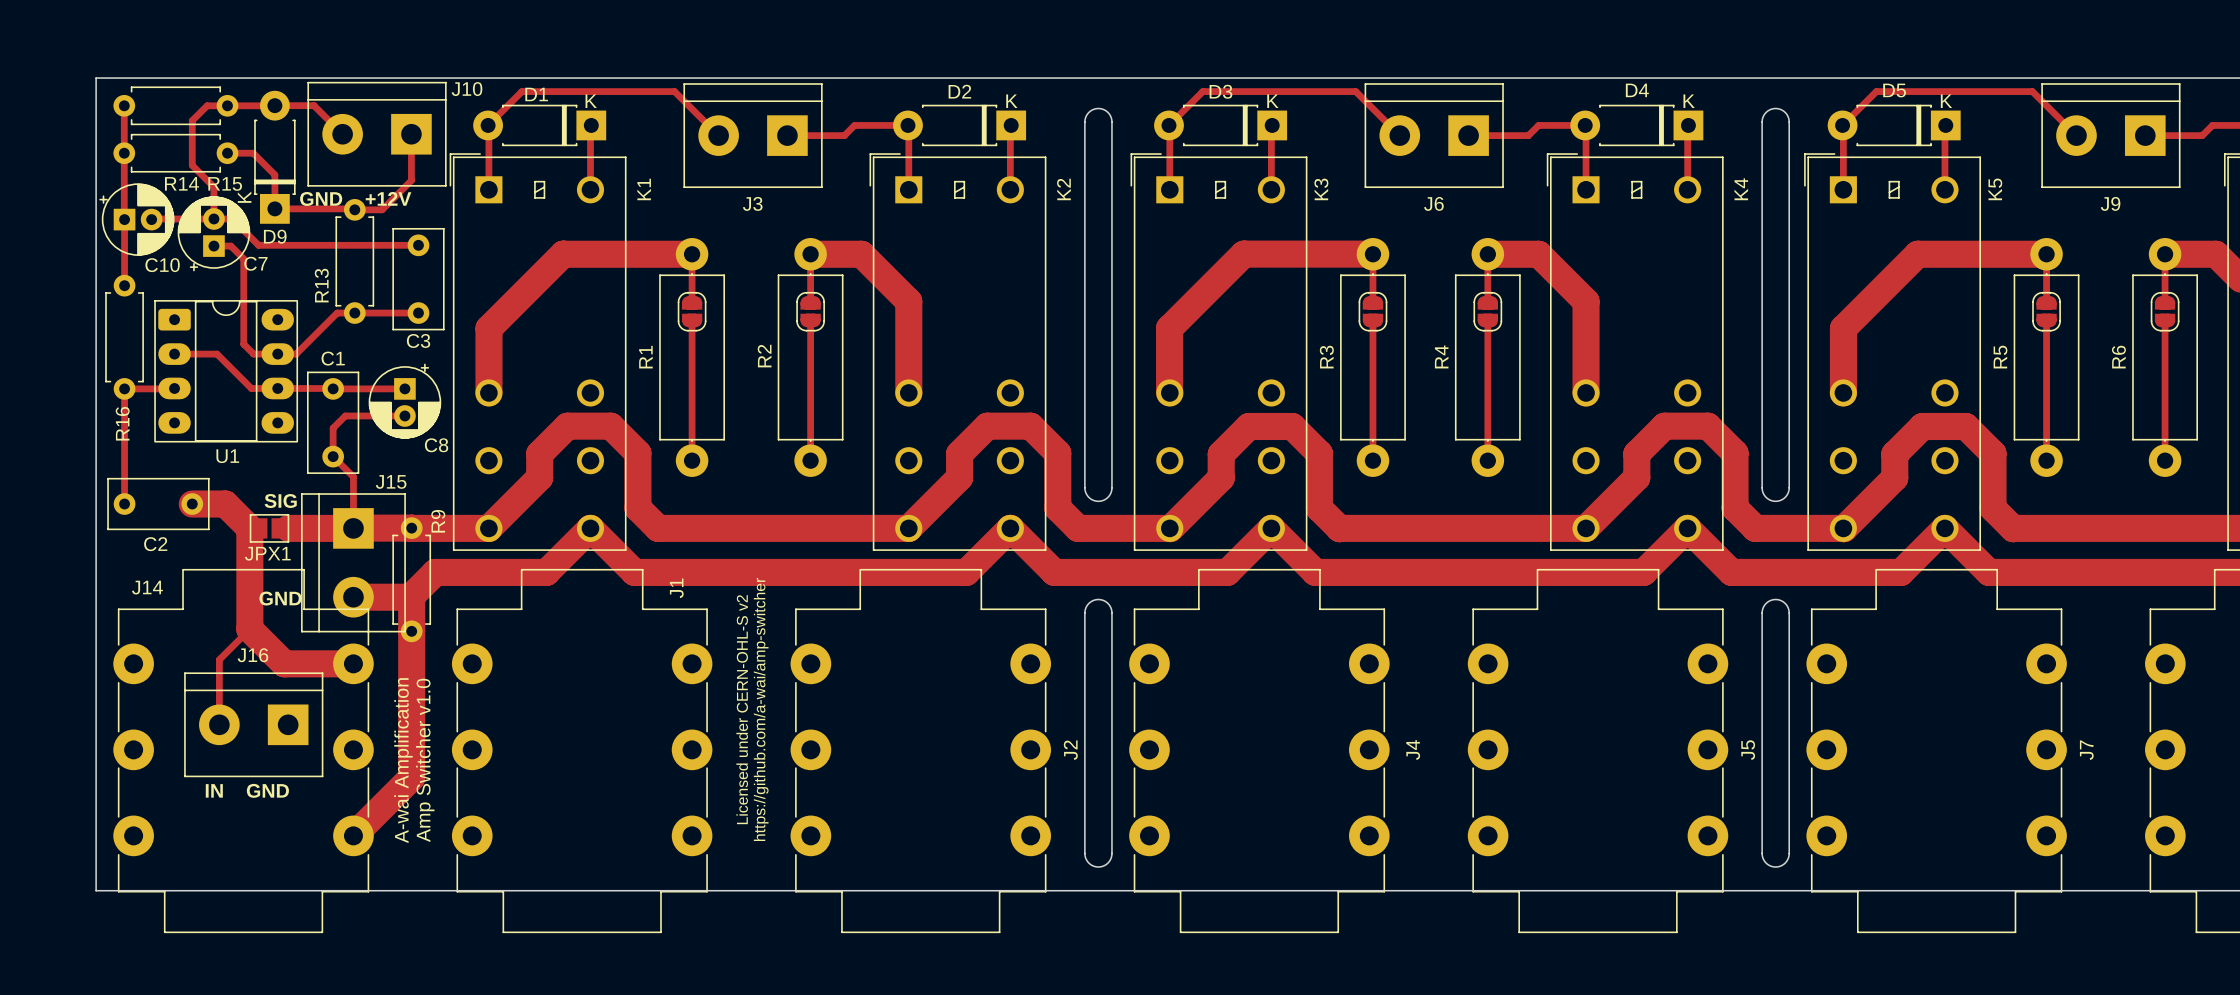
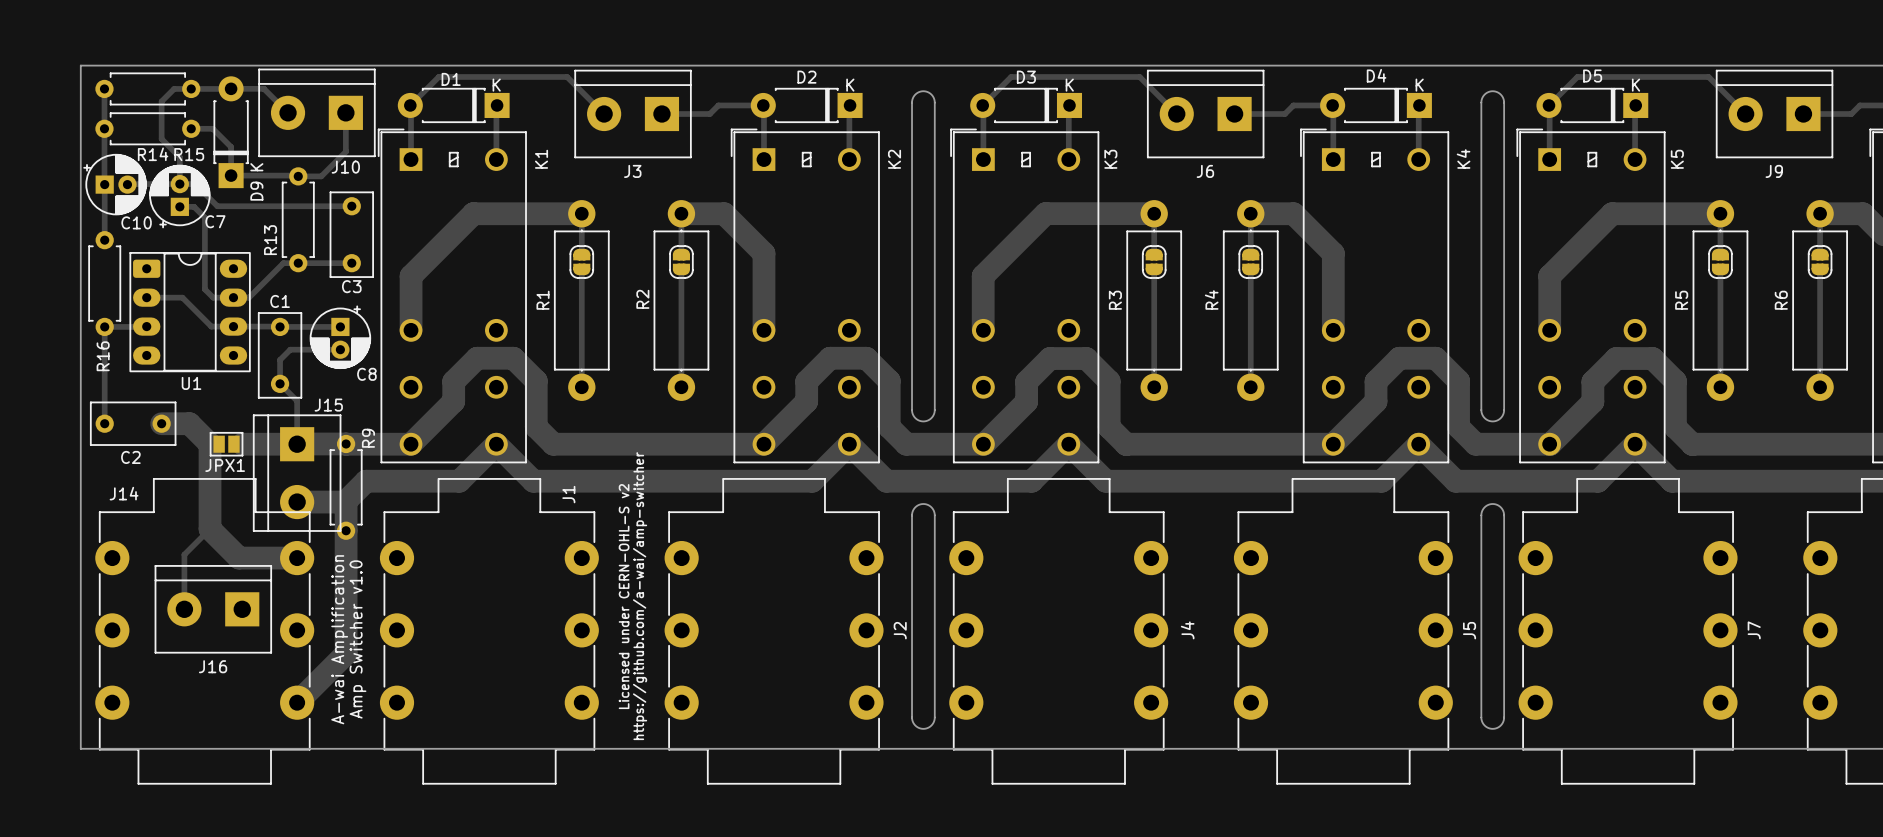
J10 name position: J10 (467, 89) -> J10 (345, 167)
D9 text position: K (244, 197) -> K (256, 167)
text: GND +12V (355, 198) -> none
D9 name rotation: 0° (275, 236) -> 90° counterclockwise (256, 191)
text: SIG (280, 501) -> none
text: GND (280, 598) -> none
J16 name position: J16 (252, 655) -> J16 (213, 666)
text: IN GND (247, 790) -> none

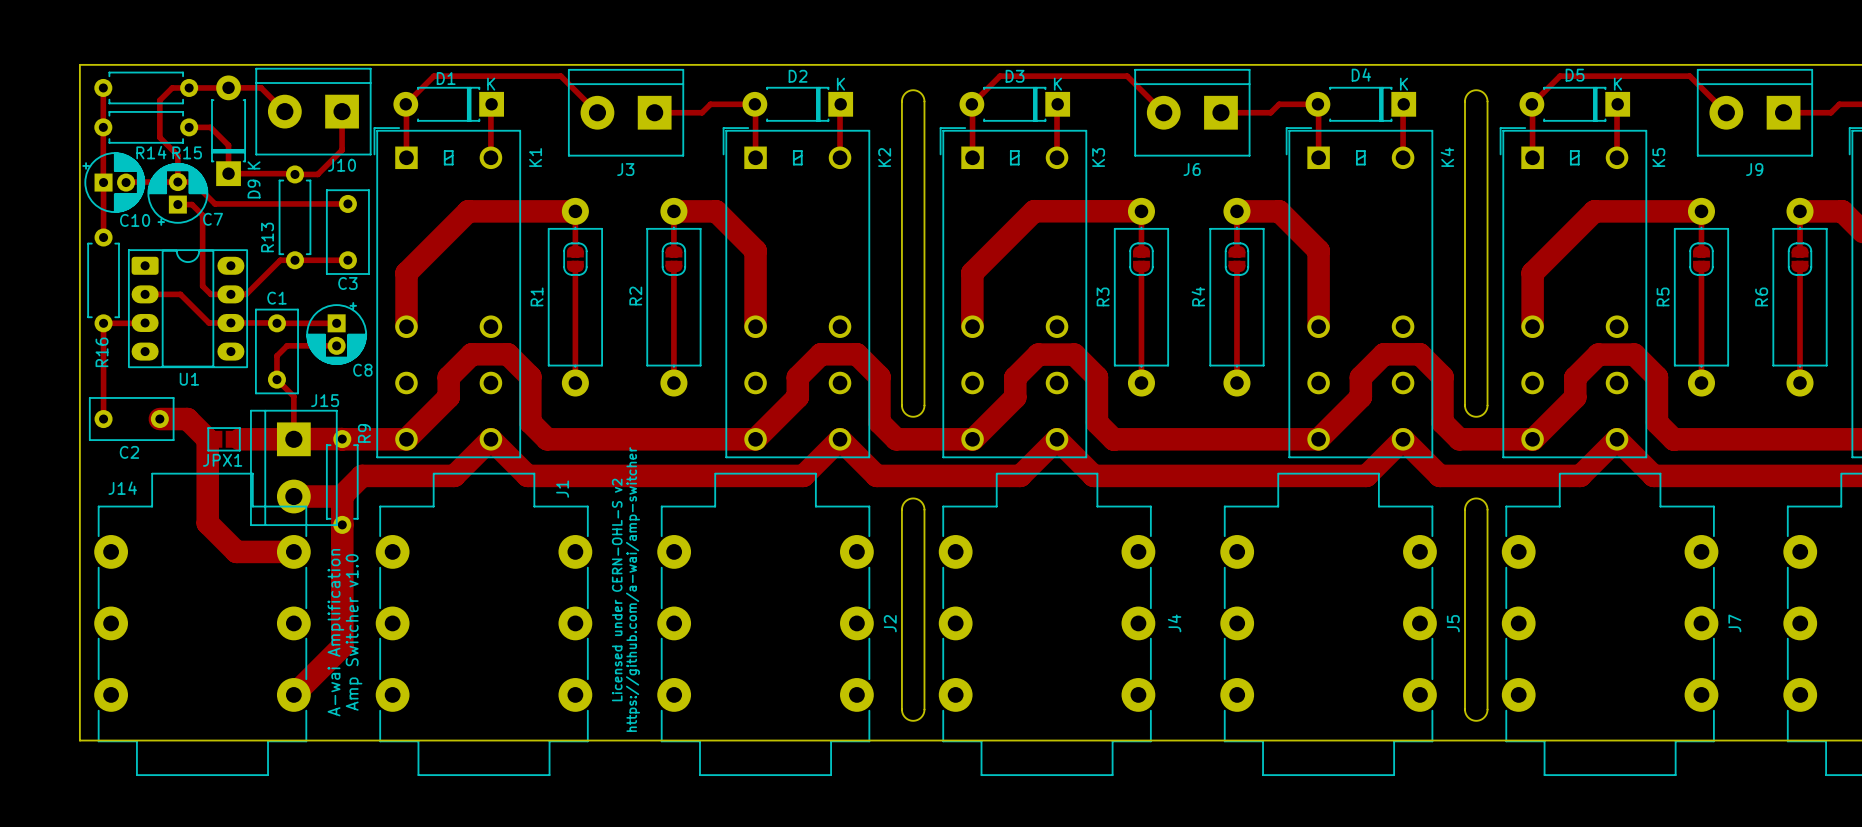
track: (210, 529) (184, 554) (184, 609) -> none
J16: (213, 609) -> none

